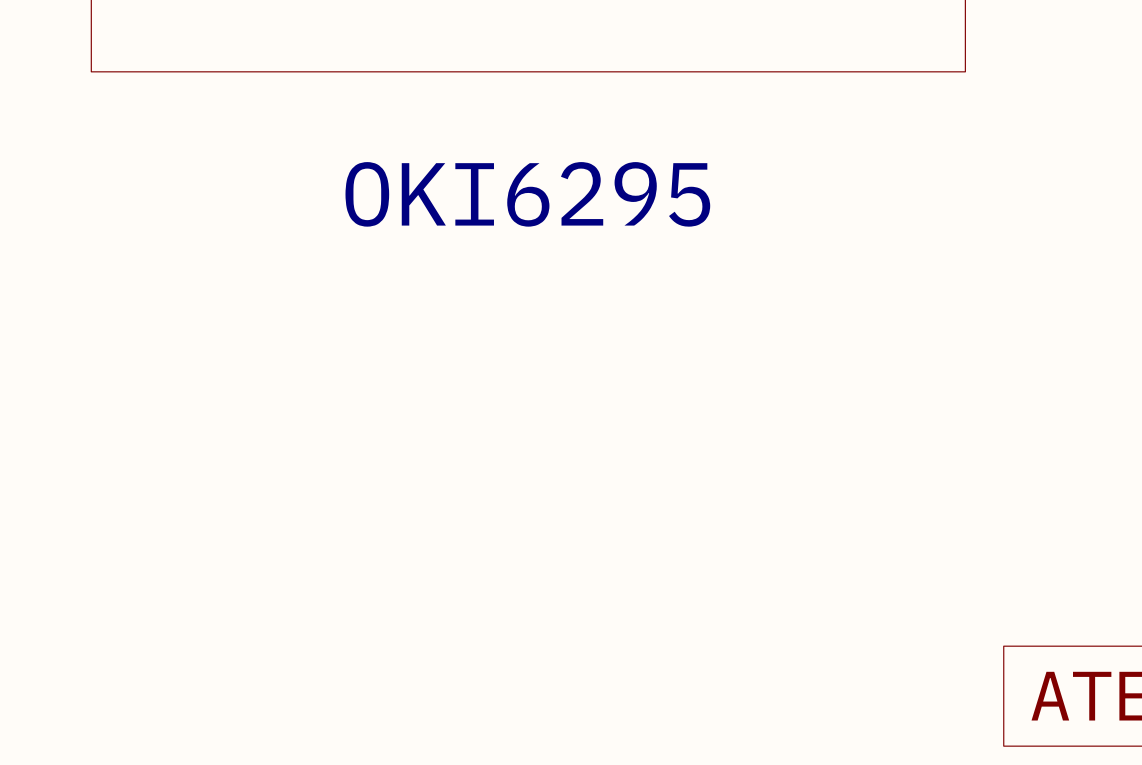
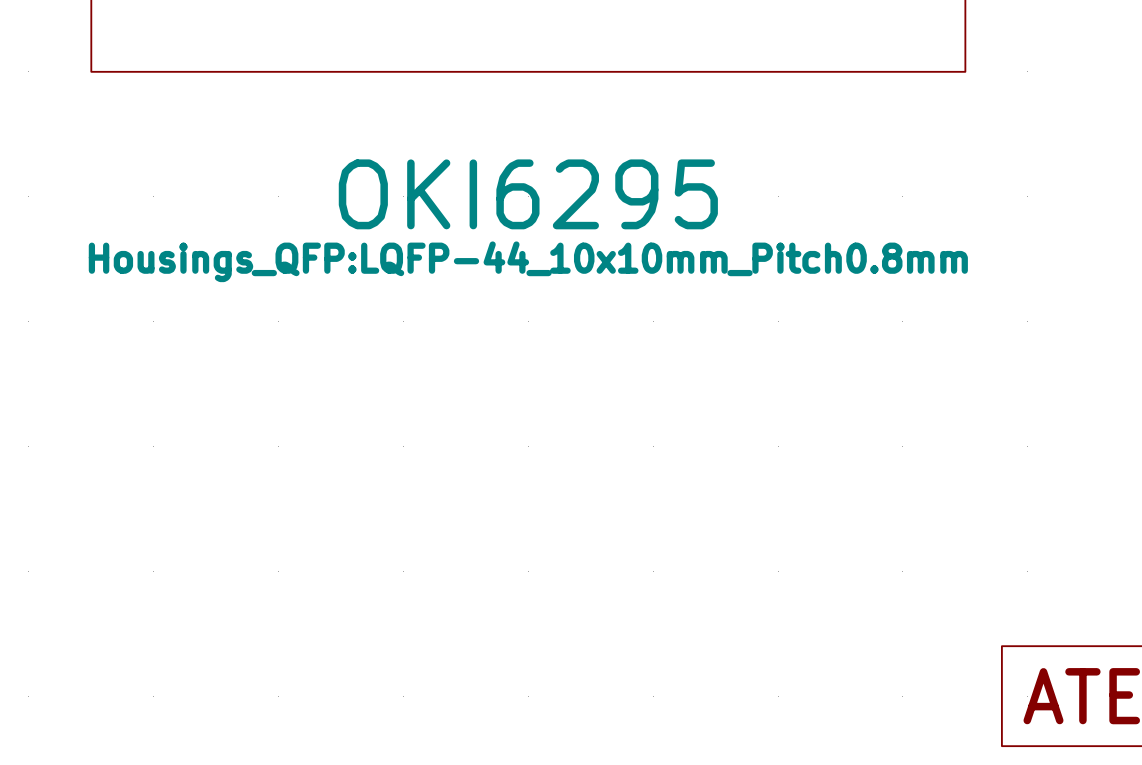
part text: none -> Housings_QFP:LQFP-44_10x10mm_Pitch0.8mm (528, 261)

